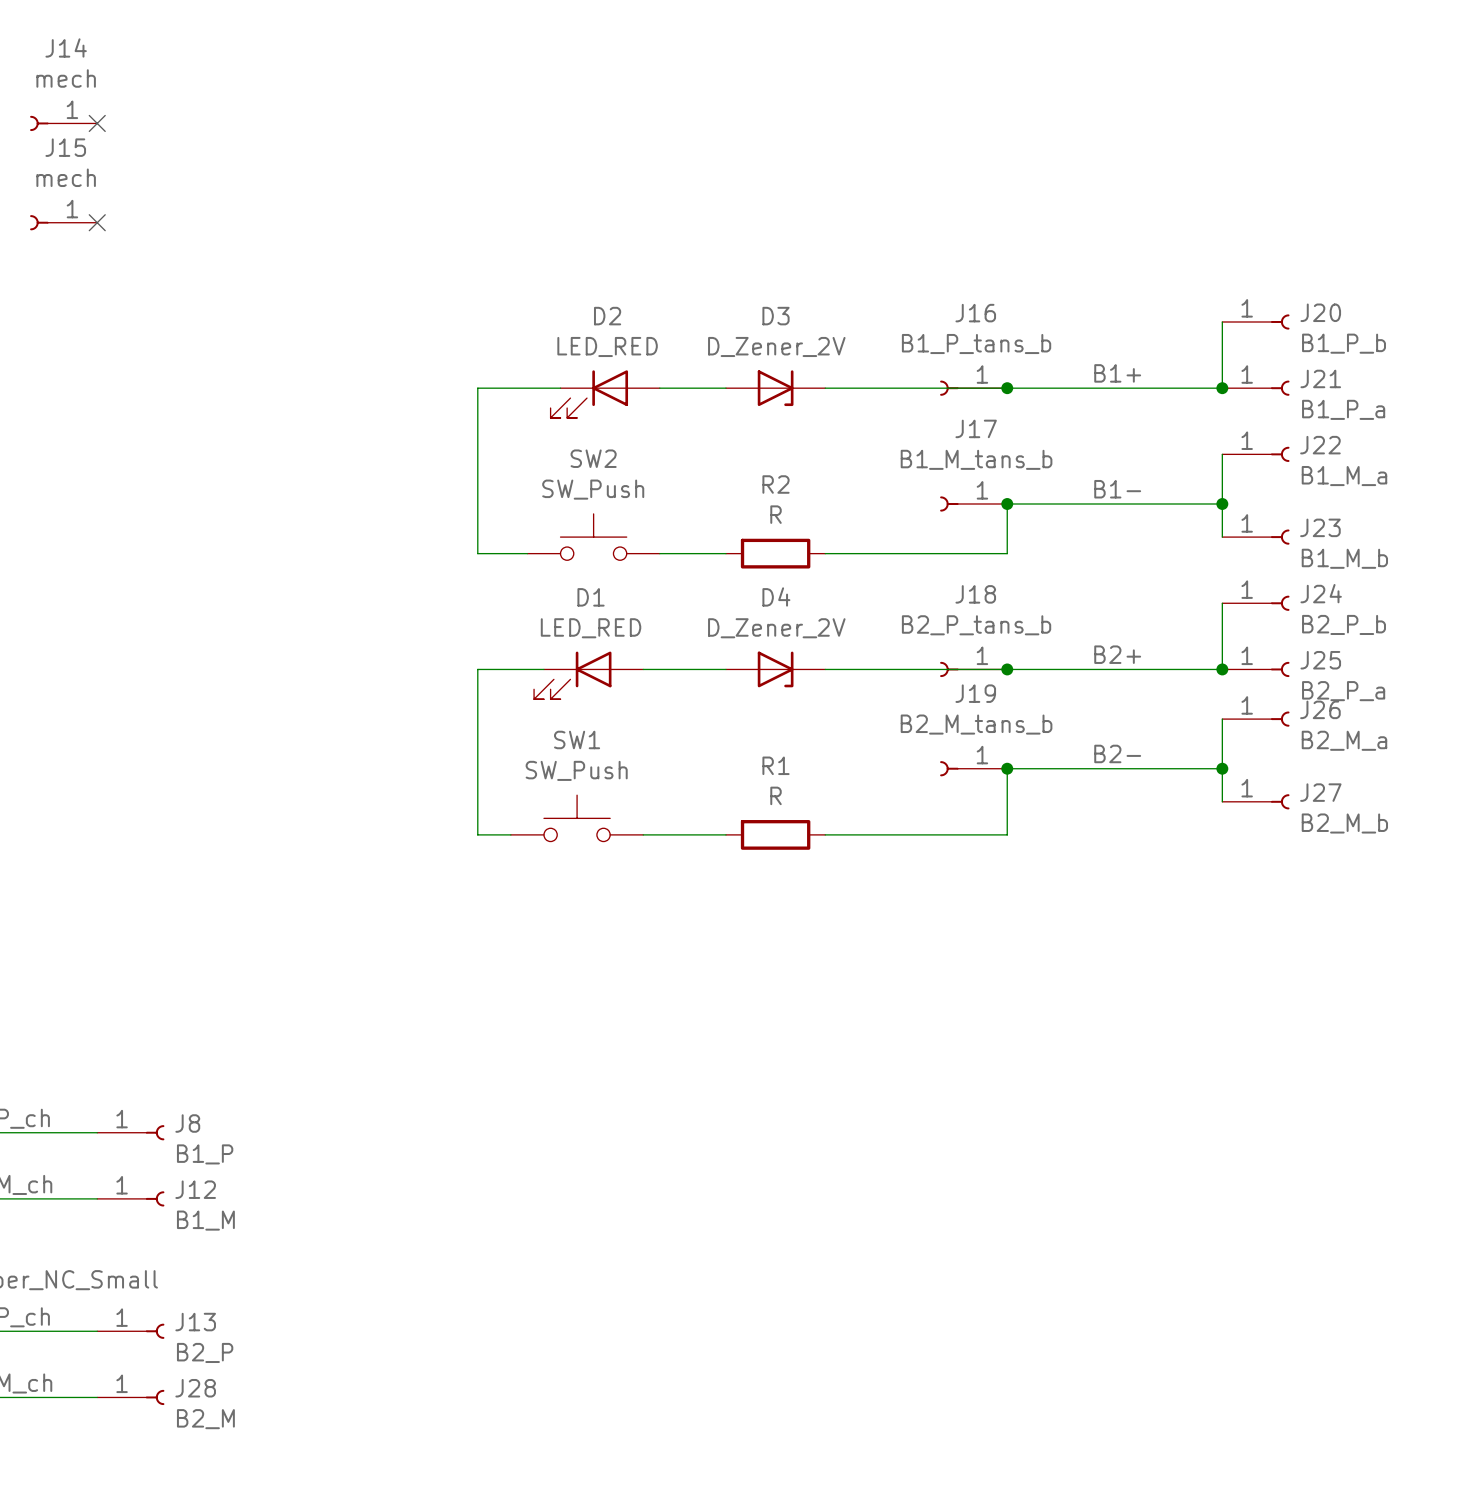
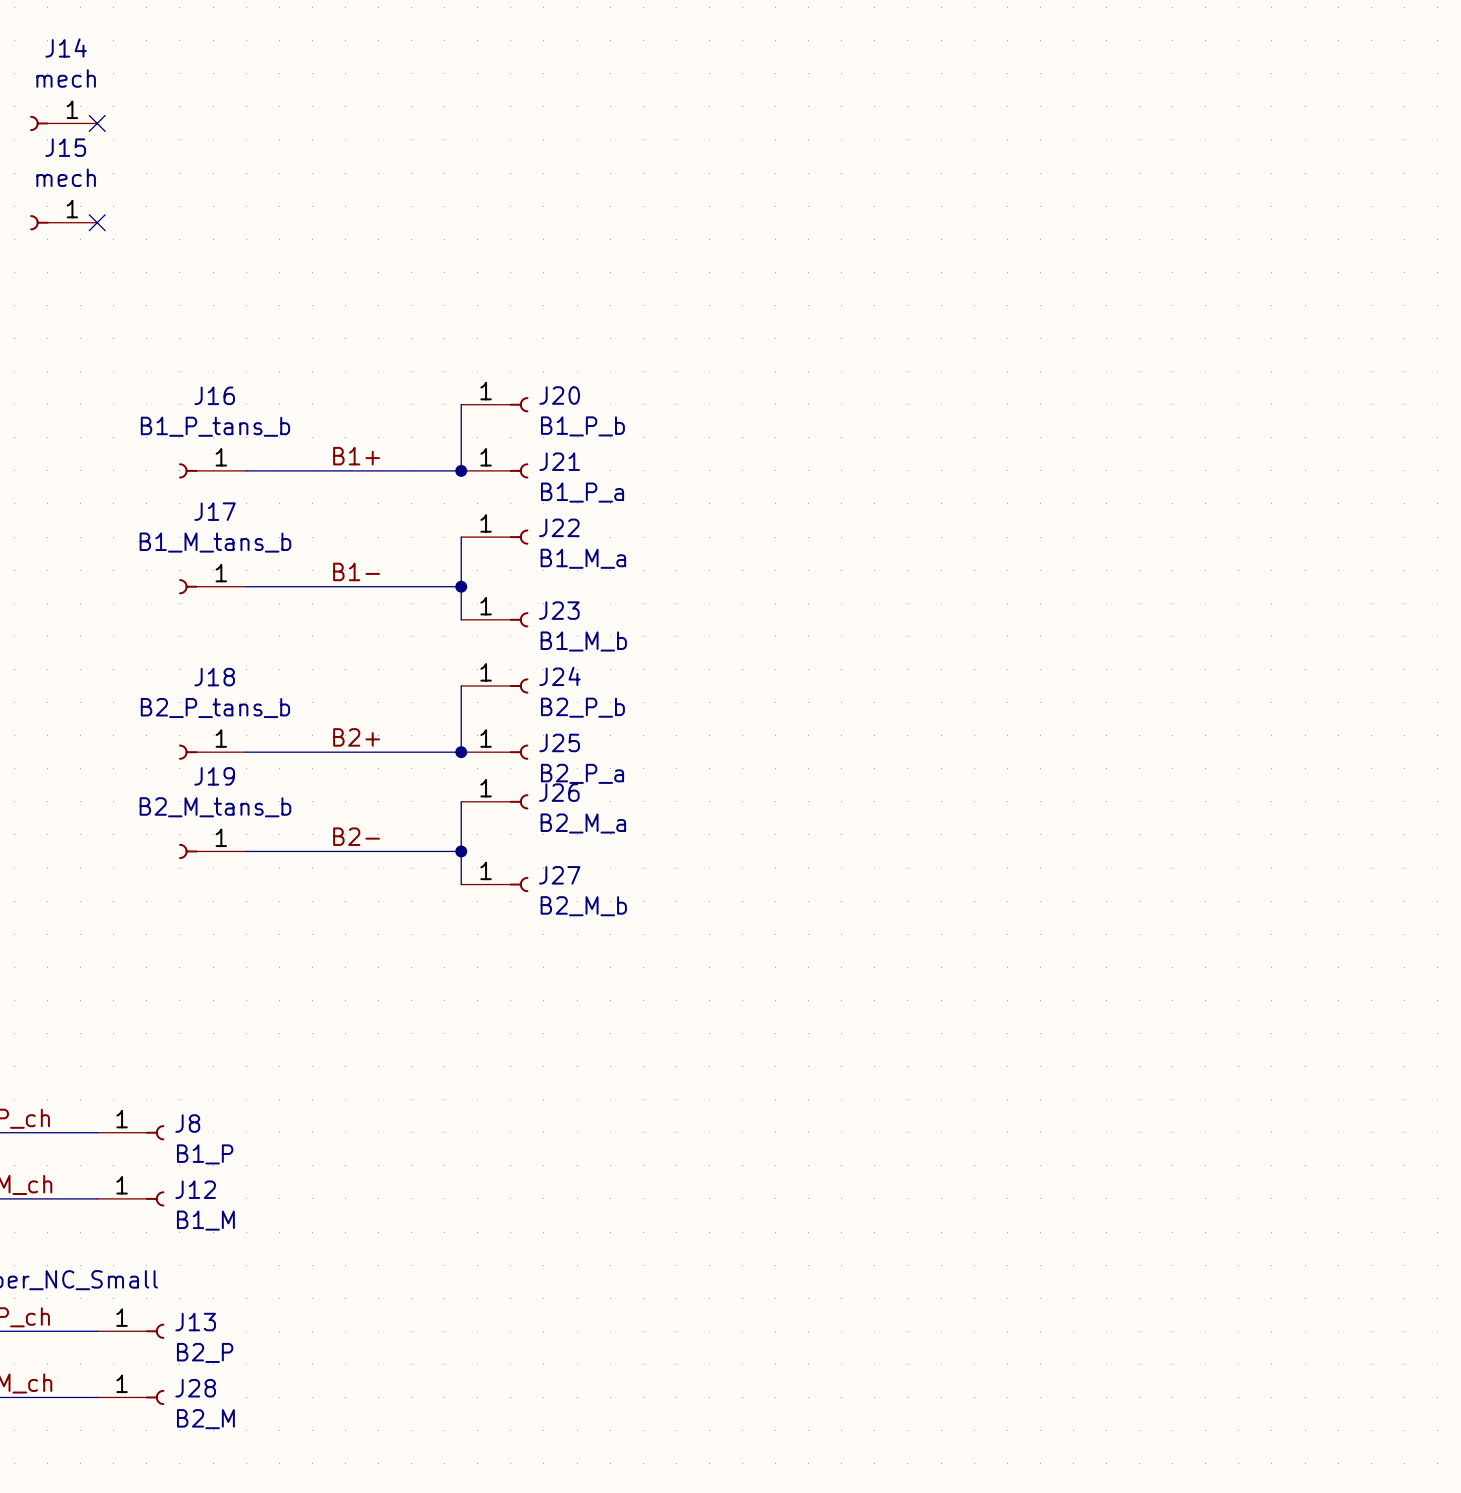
wire: (1222, 321) (1222, 388) (825, 388) -> none
J20 position: (1255, 321) -> (494, 404)
label: B1+ (1117, 373) -> none
wire: (560, 388) (477, 388) (477, 553) (527, 553) -> none
wire: (659, 388) (725, 388) -> none
D3: D_Zener_2V (775, 388) -> none
J16 position: (973, 388) -> (212, 470)
junction: (1007, 388) -> none
junction: (1222, 388) -> none
J21 position: (1255, 388) -> (494, 470)
D2: LED_RED (605, 394) -> none
wire: none -> (461, 404) (461, 470) (246, 470)
wire: (1222, 454) (1222, 537) -> none
J22 position: (1255, 454) -> (494, 537)
label: none -> B1+ (356, 456)
junction: none -> (461, 470)
label: B1- (1117, 489) -> none
J17 position: (973, 503) -> (212, 586)
junction: (1007, 503) -> none
wire: (1222, 503) (1007, 503) (1007, 553) (825, 553) -> none
junction: (1222, 503) -> none
wire: none -> (461, 537) (461, 619)
SW2: SW_Push (593, 537) -> none
J23 position: (1255, 537) -> (494, 619)
wire: (659, 553) (725, 553) -> none
R2: R (775, 553) -> none
label: none -> B1- (356, 571)
wire: none -> (246, 586) (461, 586)
junction: none -> (461, 586)
wire: (1222, 603) (1222, 669) (825, 669) -> none
J24 position: (1255, 603) -> (494, 686)
label: B2+ (1117, 654) -> none
wire: (543, 669) (477, 669) (477, 834) (510, 834) -> none
wire: (643, 669) (725, 669) -> none
D4: D_Zener_2V (775, 669) -> none
J18 position: (973, 669) -> (212, 752)
junction: (1007, 669) -> none
junction: (1222, 669) -> none
J25 position: (1255, 669) -> (494, 752)
D1: LED_RED (588, 675) -> none
wire: none -> (461, 686) (461, 752) (246, 752)
wire: (1222, 719) (1222, 801) -> none
J26 position: (1255, 719) -> (494, 801)
label: none -> B2+ (356, 737)
junction: none -> (461, 752)
label: B2- (1117, 753) -> none
J19 position: (973, 768) -> (212, 851)
junction: (1007, 768) -> none
wire: (1222, 768) (1007, 768) (1007, 834) (825, 834) -> none
junction: (1222, 768) -> none
wire: none -> (461, 801) (461, 884)
J27 position: (1255, 801) -> (494, 884)
SW1: SW_Push (577, 818) -> none
wire: (643, 834) (725, 834) -> none
R1: R (775, 834) -> none
label: none -> B2- (356, 836)
wire: none -> (246, 851) (461, 851)
junction: none -> (461, 851)

